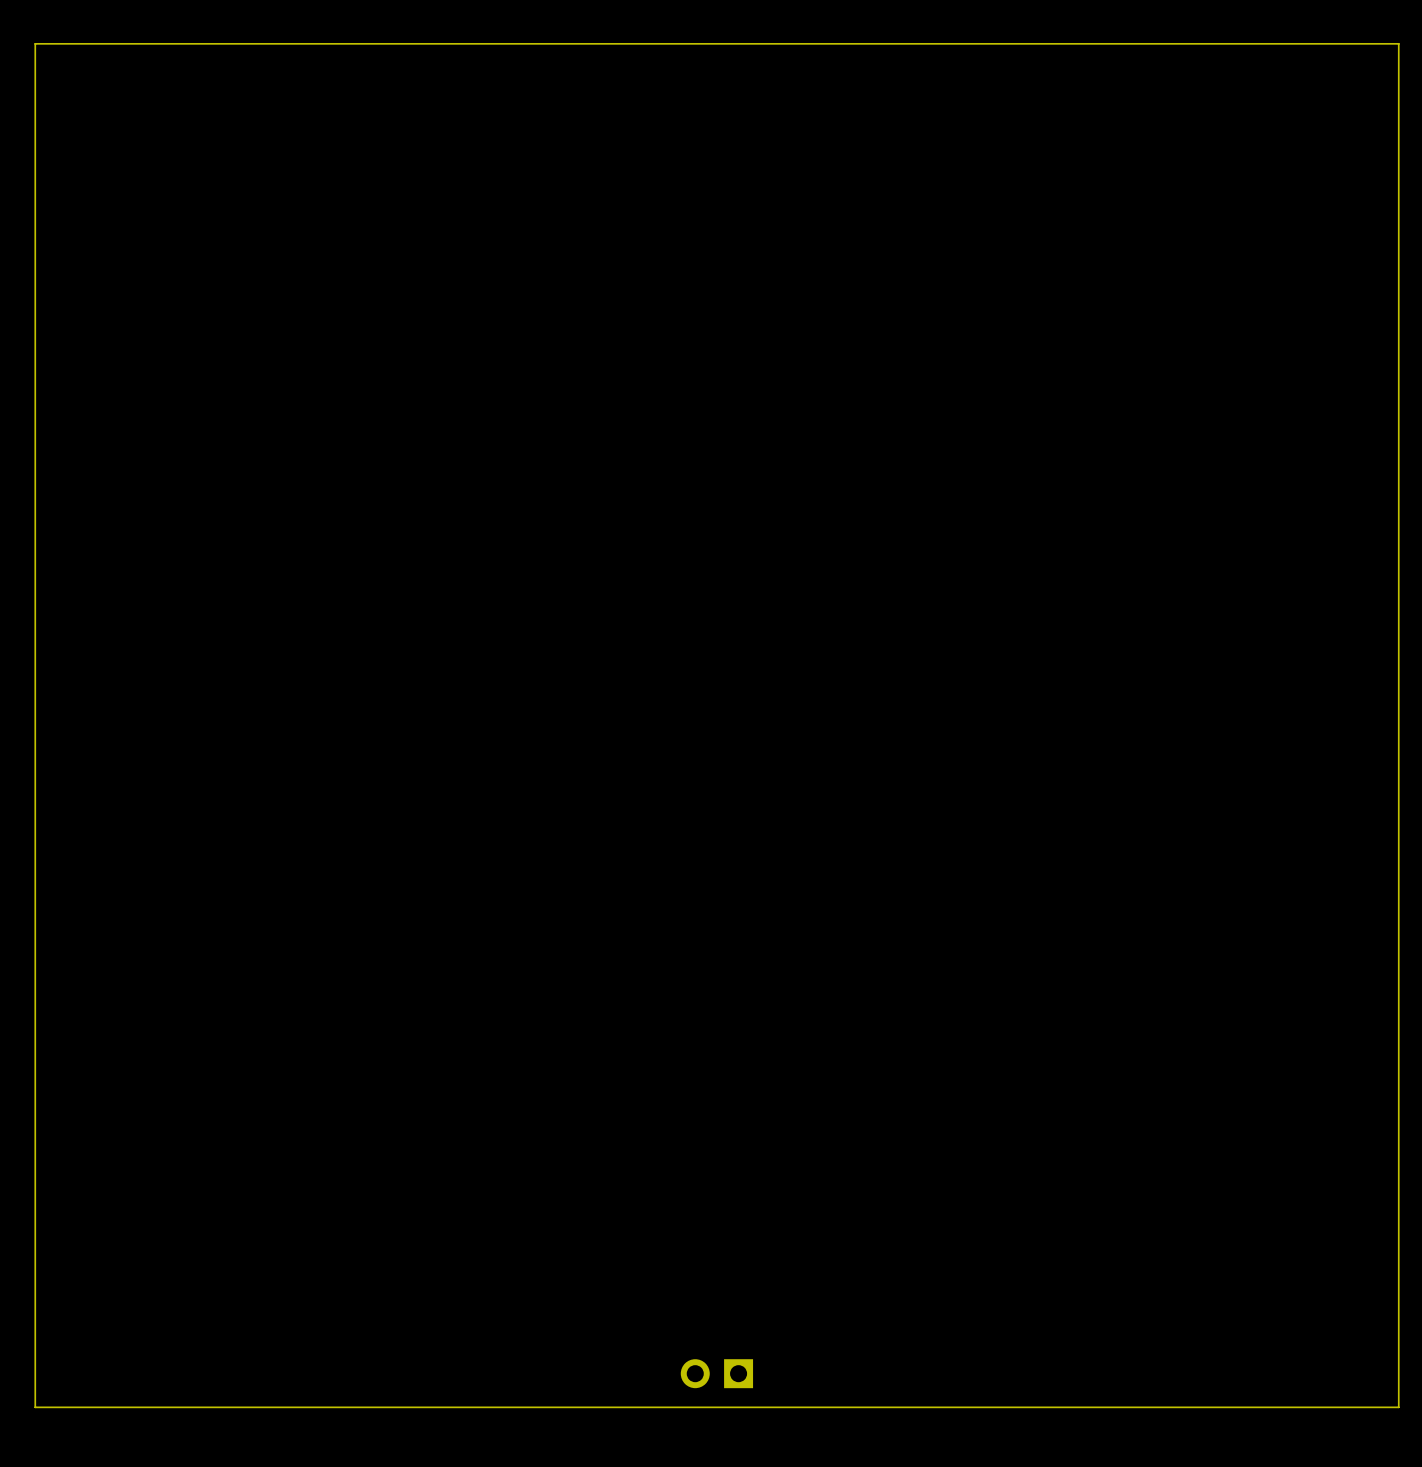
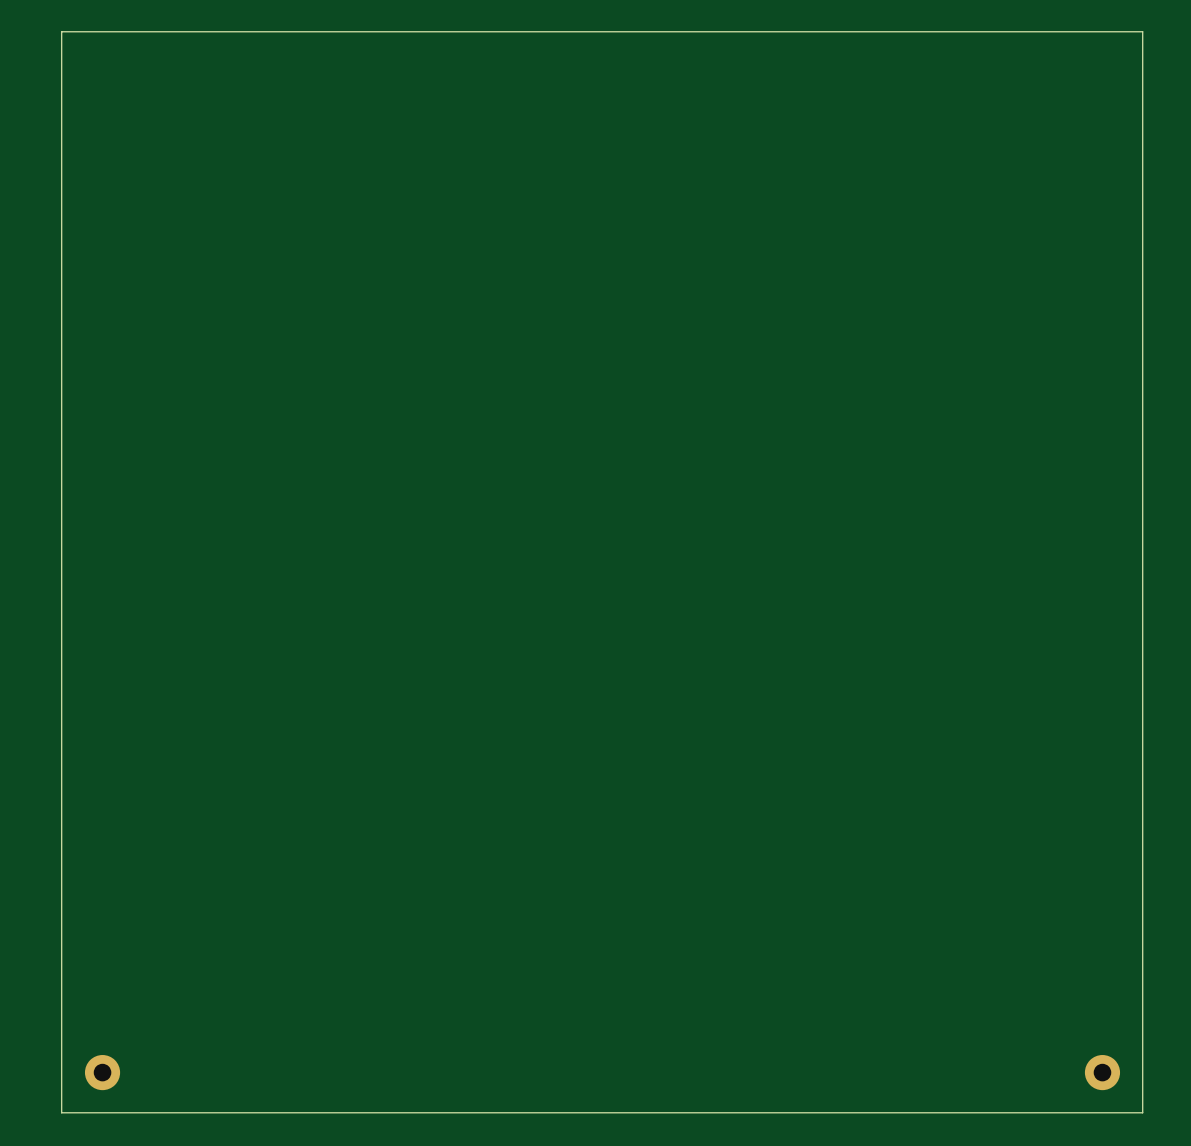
part: none -> (102, 1072)
part: none -> (1102, 1072)
part: (716, 1373) -> none

